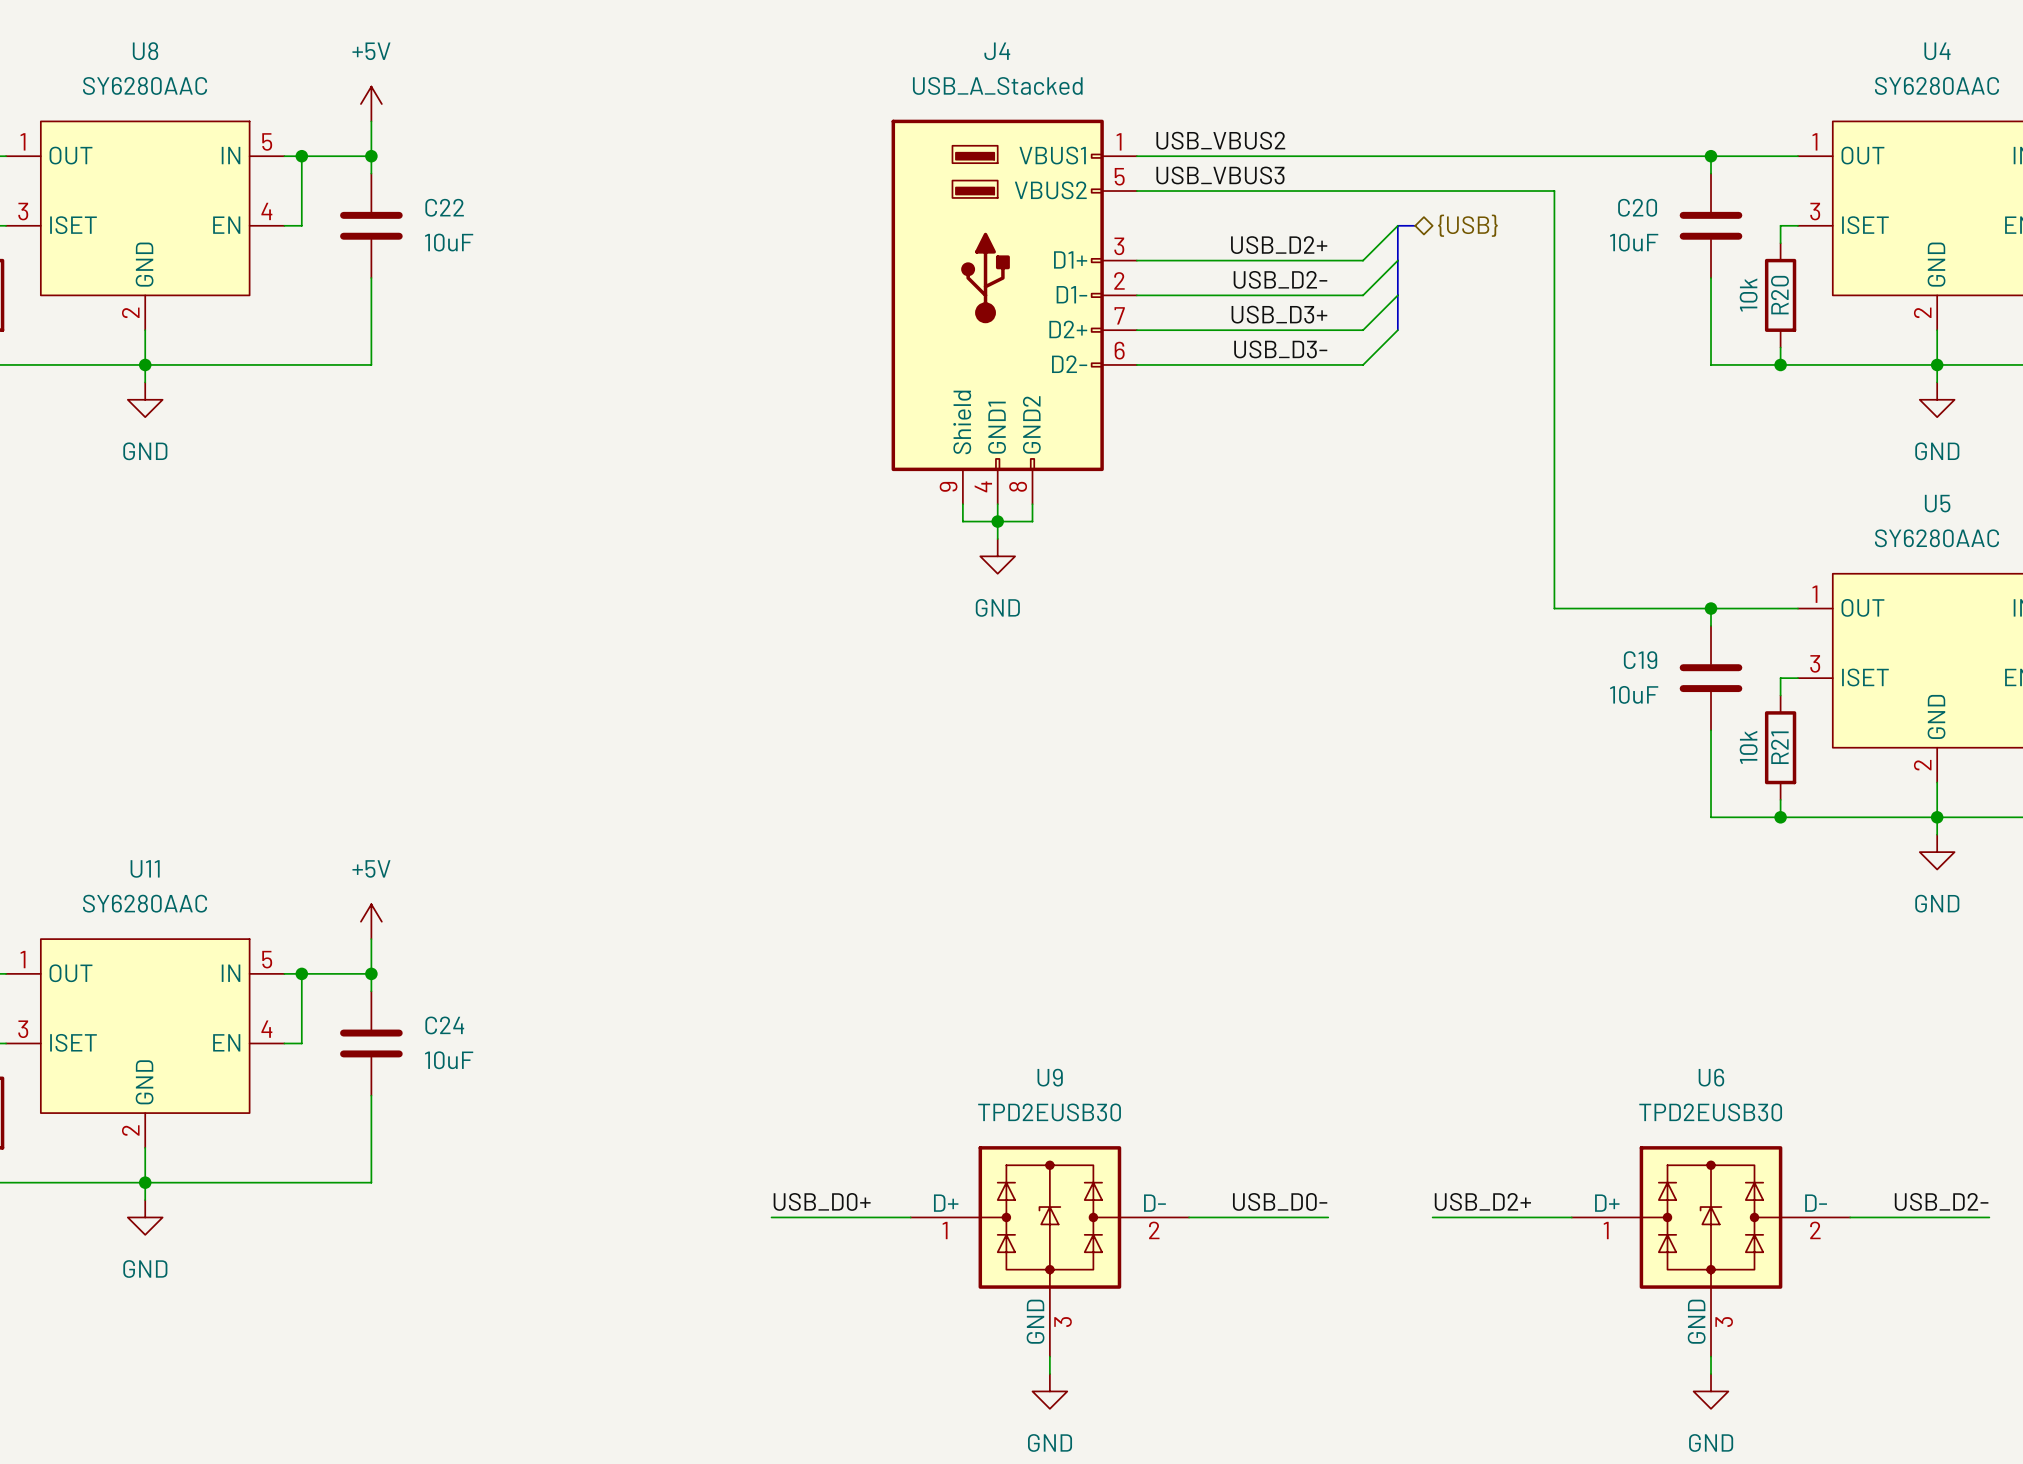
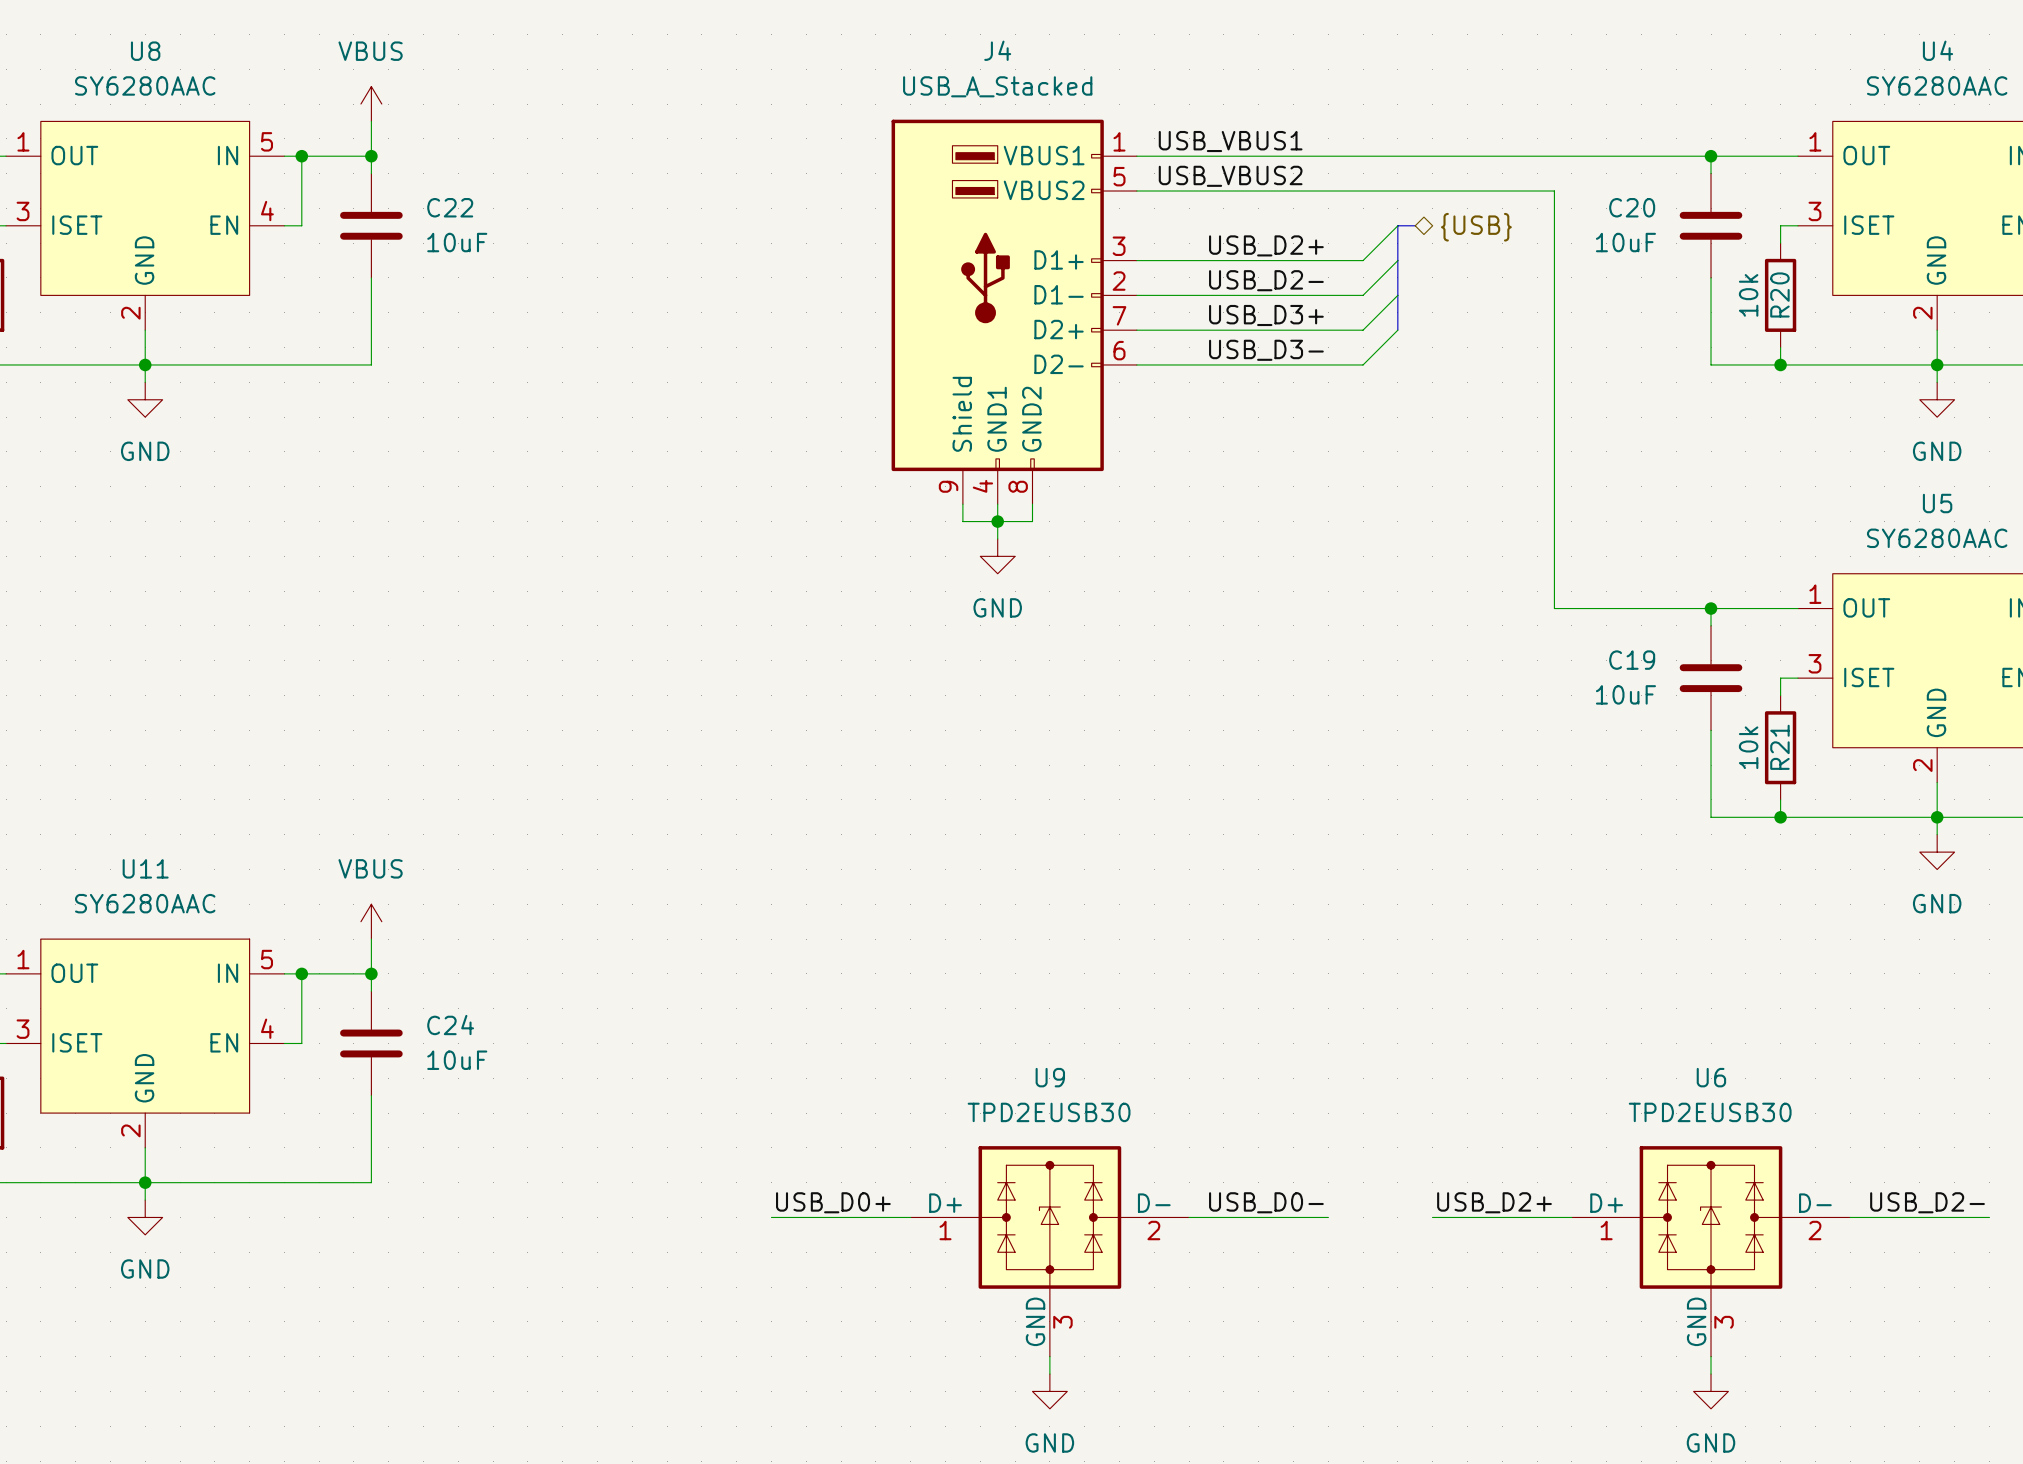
power symbol: +5V (371, 104) -> VBUS (371, 104)
label: USB_VBUS2 (1220, 140) -> USB_VBUS1 (1230, 141)
label: USB_VBUS3 (1220, 175) -> USB_VBUS2 (1230, 176)
power symbol: +5V (371, 921) -> VBUS (371, 921)

